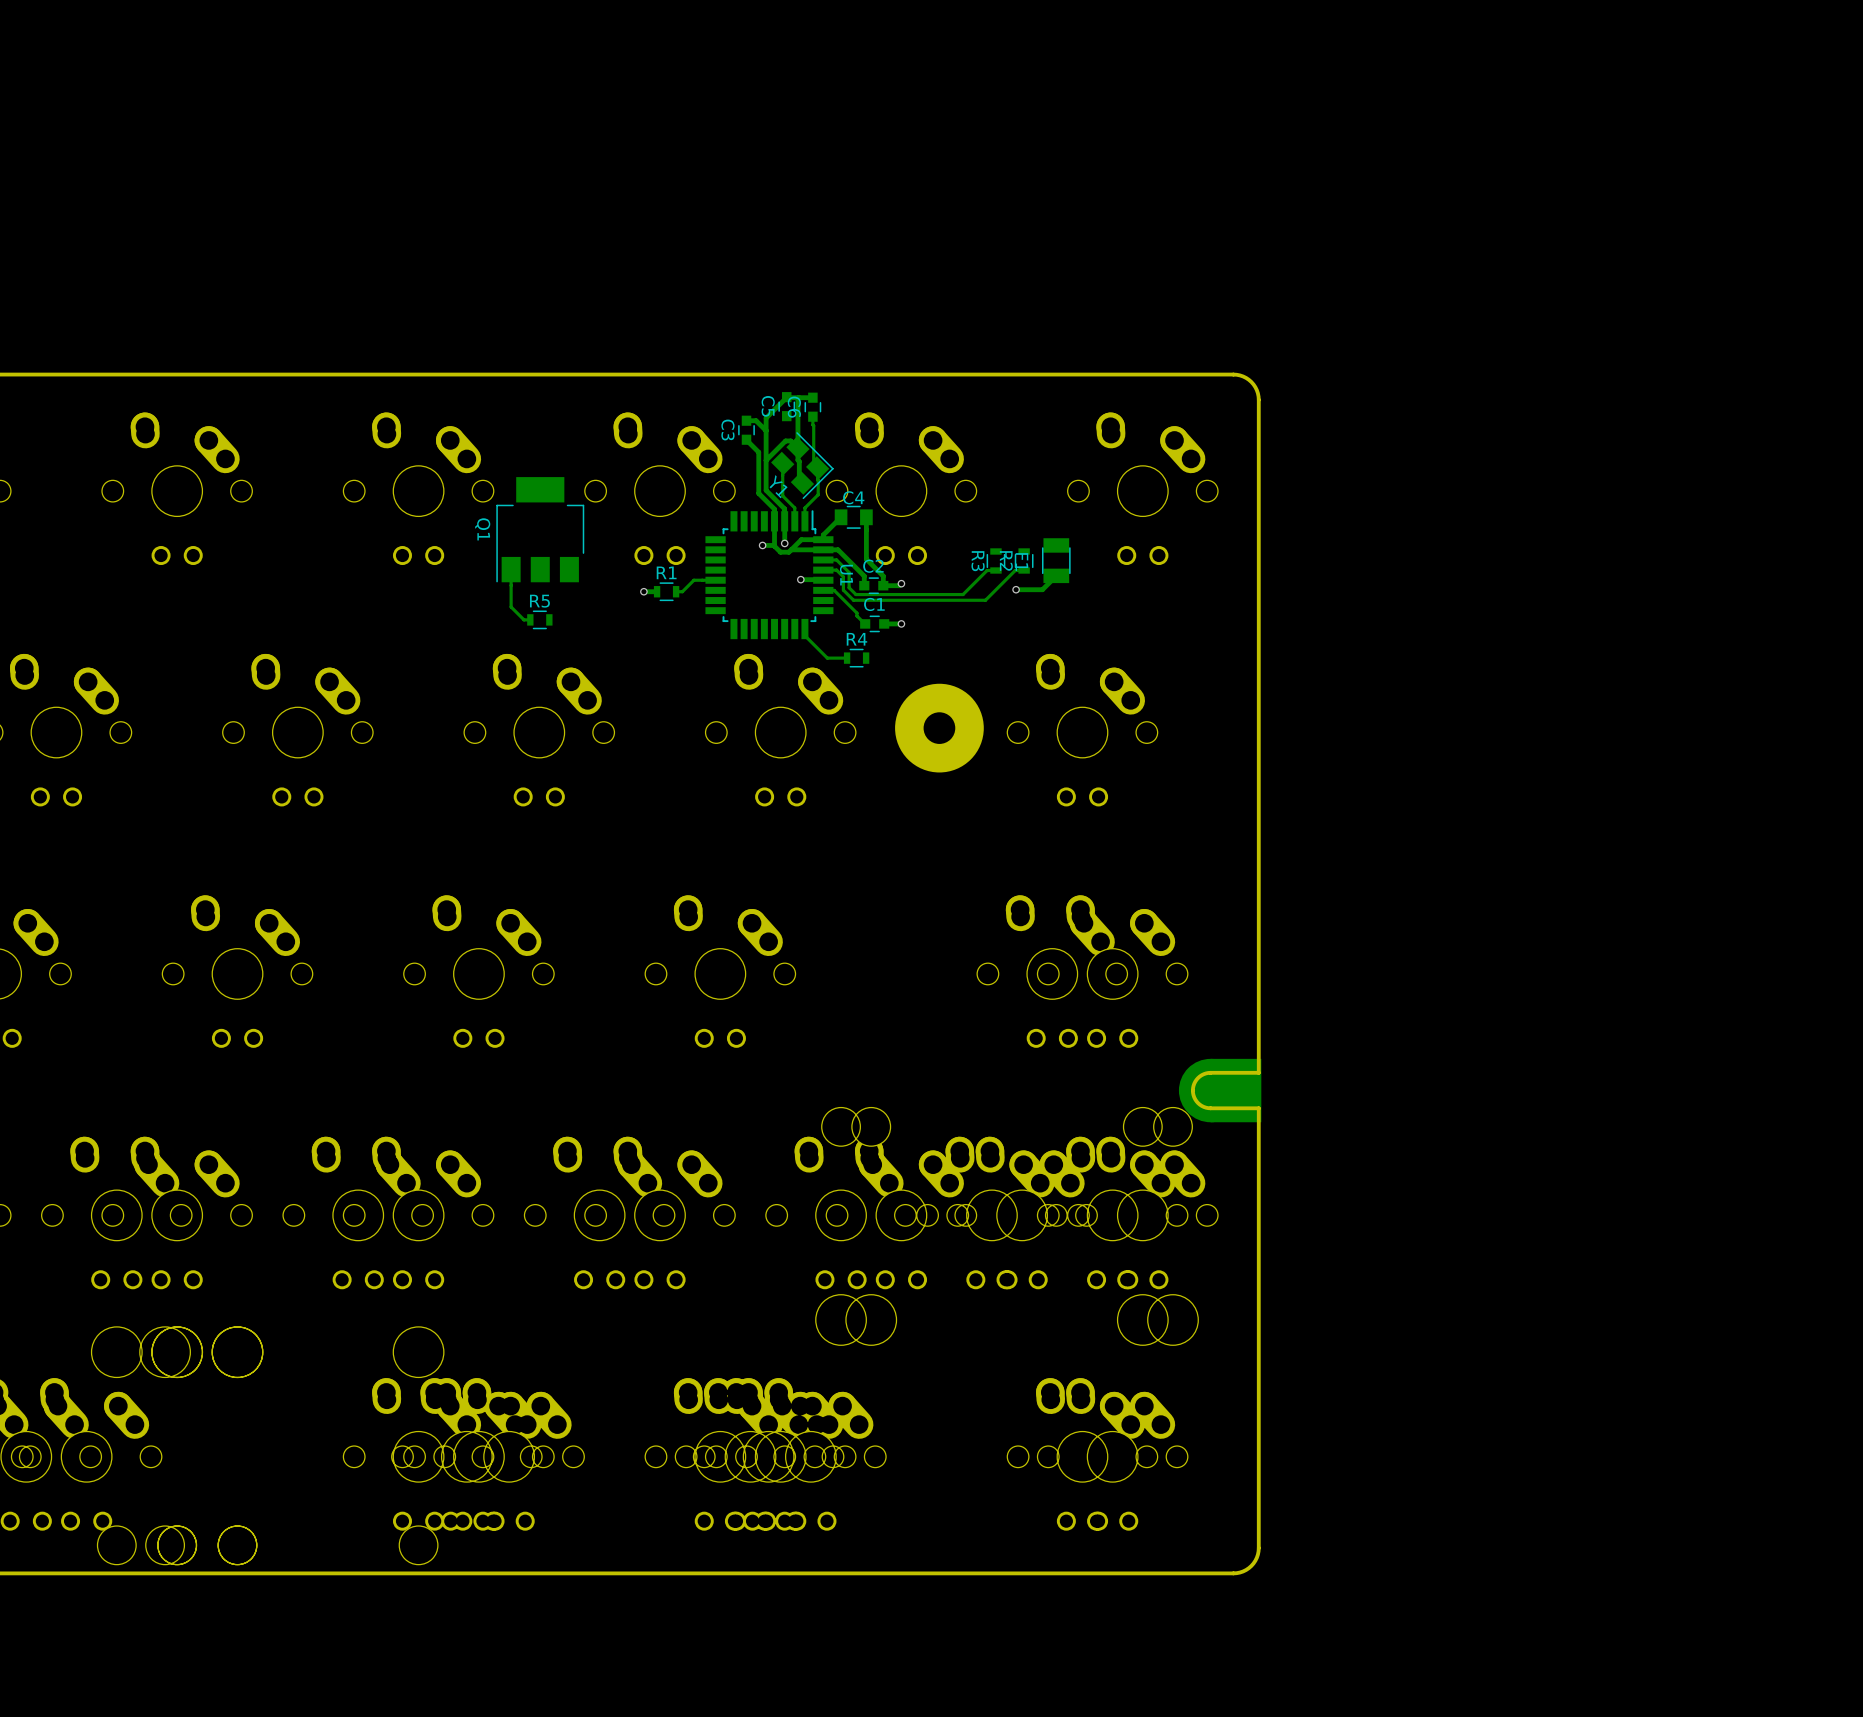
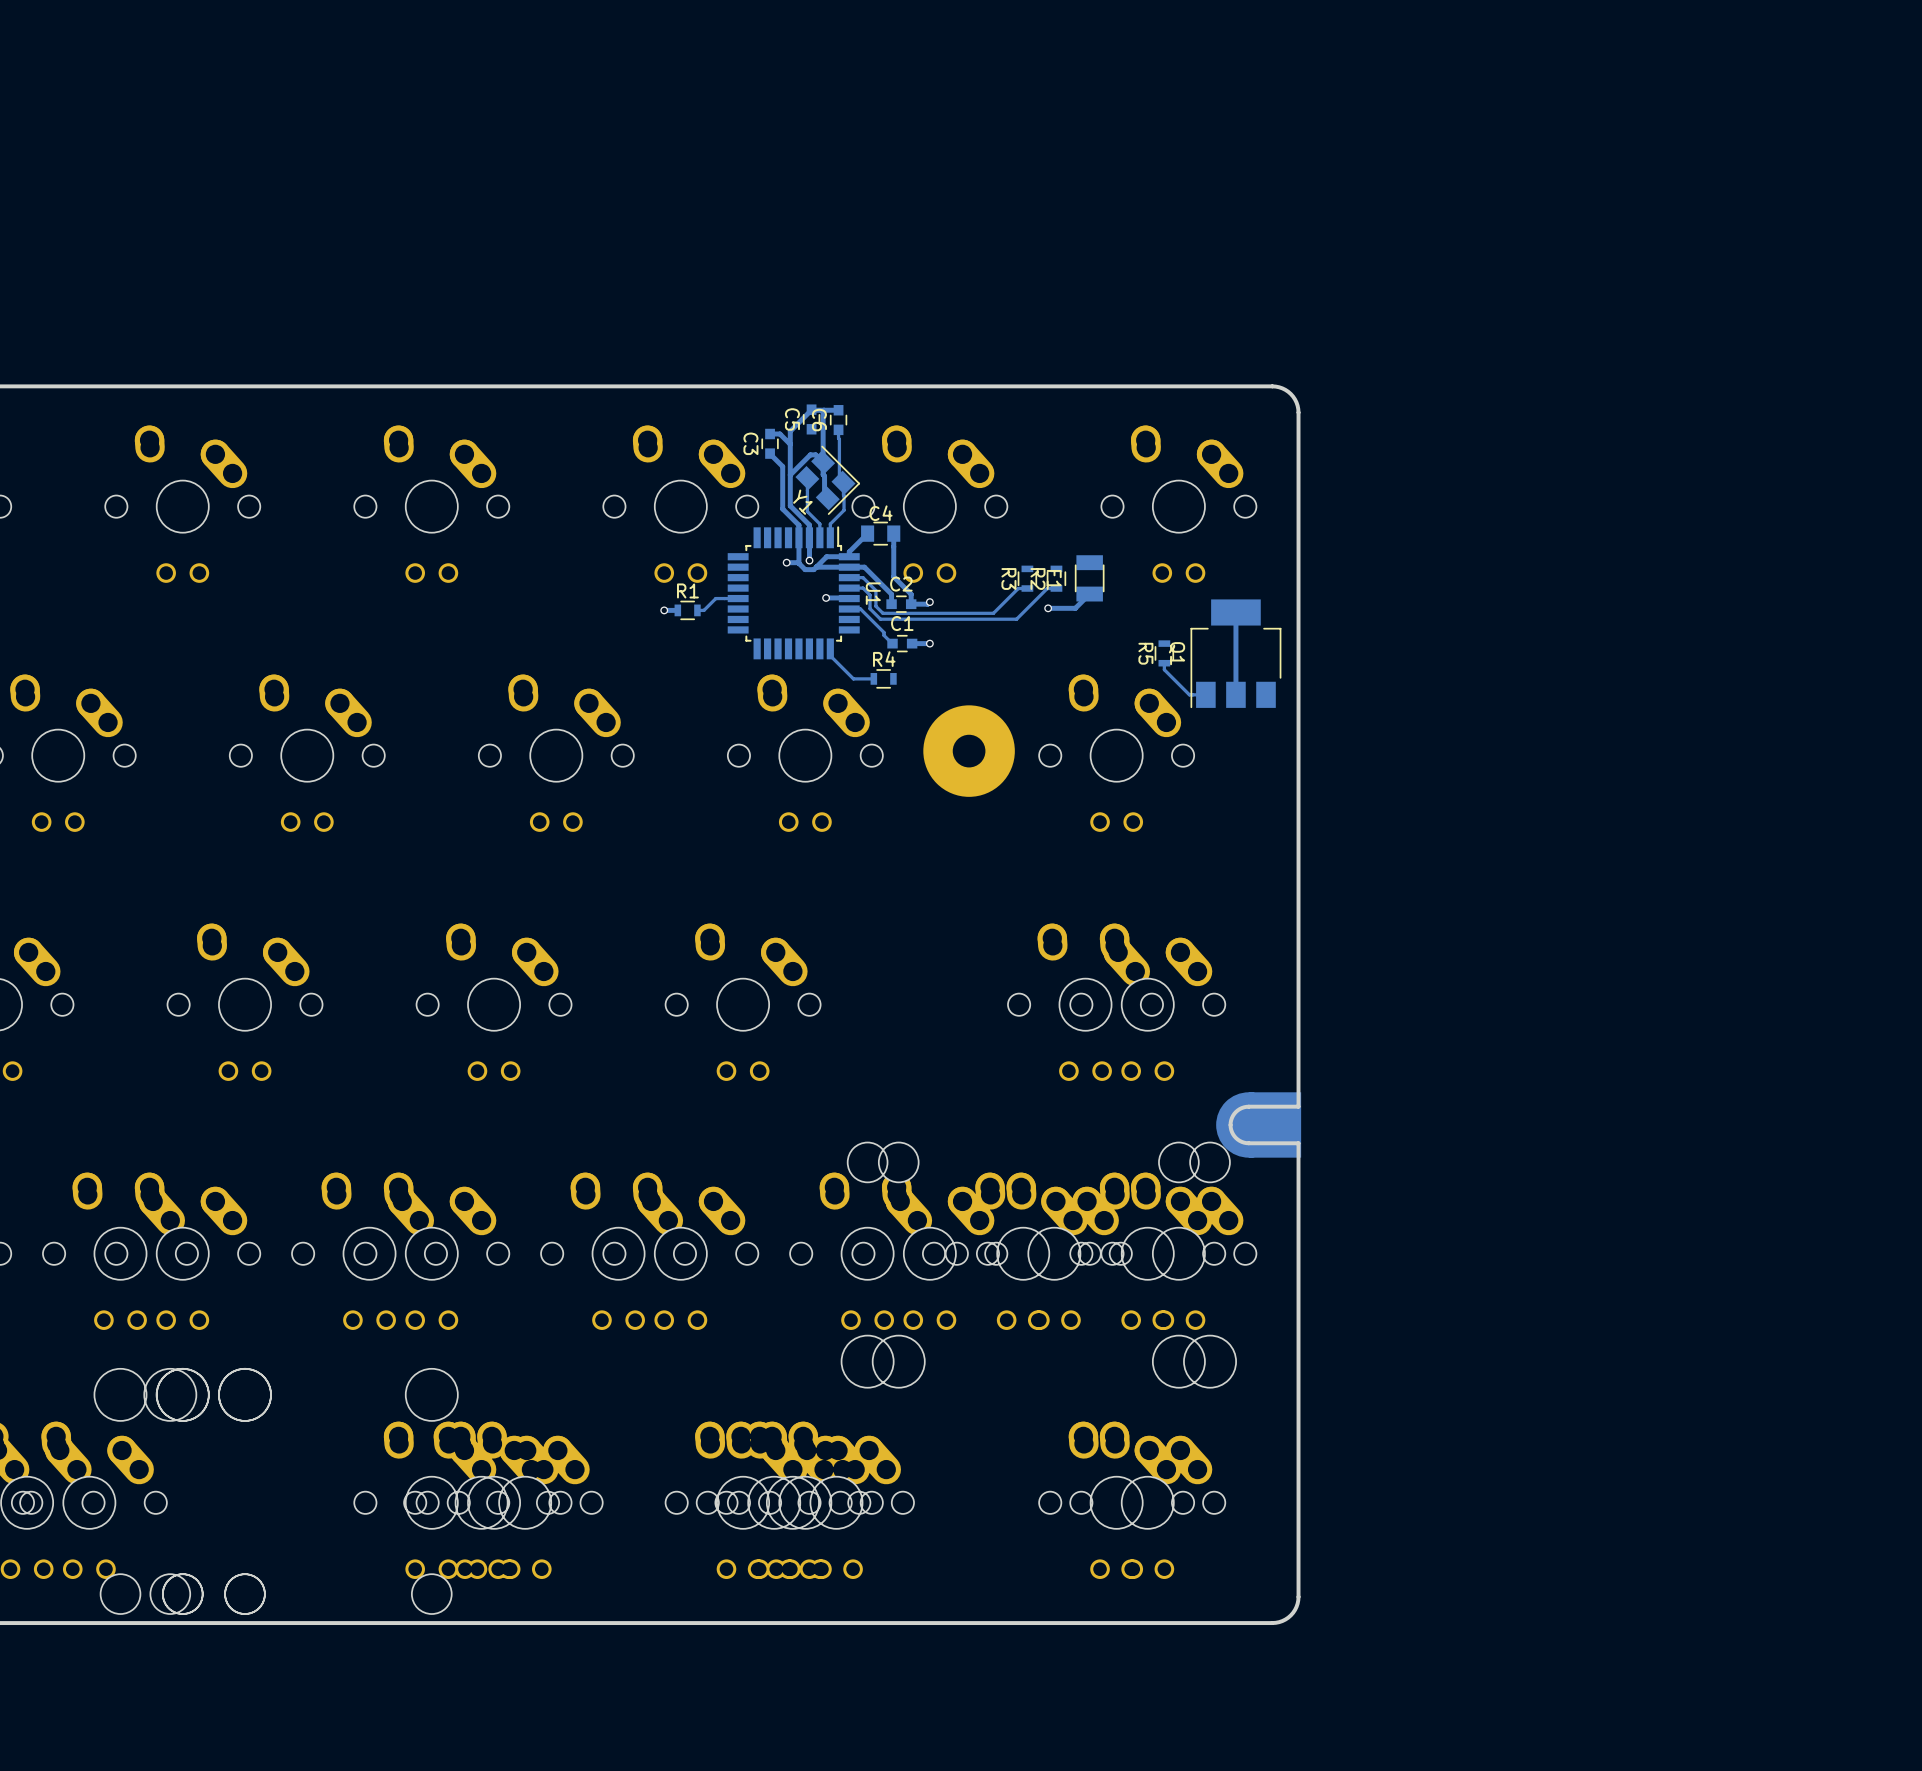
Q1 position: (540, 529) -> (1235, 653)
track: (511, 569) (511, 607) (524, 619) (530, 619) -> none
track: none -> (1235, 612) (1235, 694)
R5 name position: R5 (539, 601) -> R5 (1145, 653)
R5 rotation: 0° (539, 619) -> 90° clockwise (1164, 653)
R5 position: (539, 619) -> (1164, 653)
track: none -> (1164, 663) (1164, 669) (1189, 694) (1205, 694)

